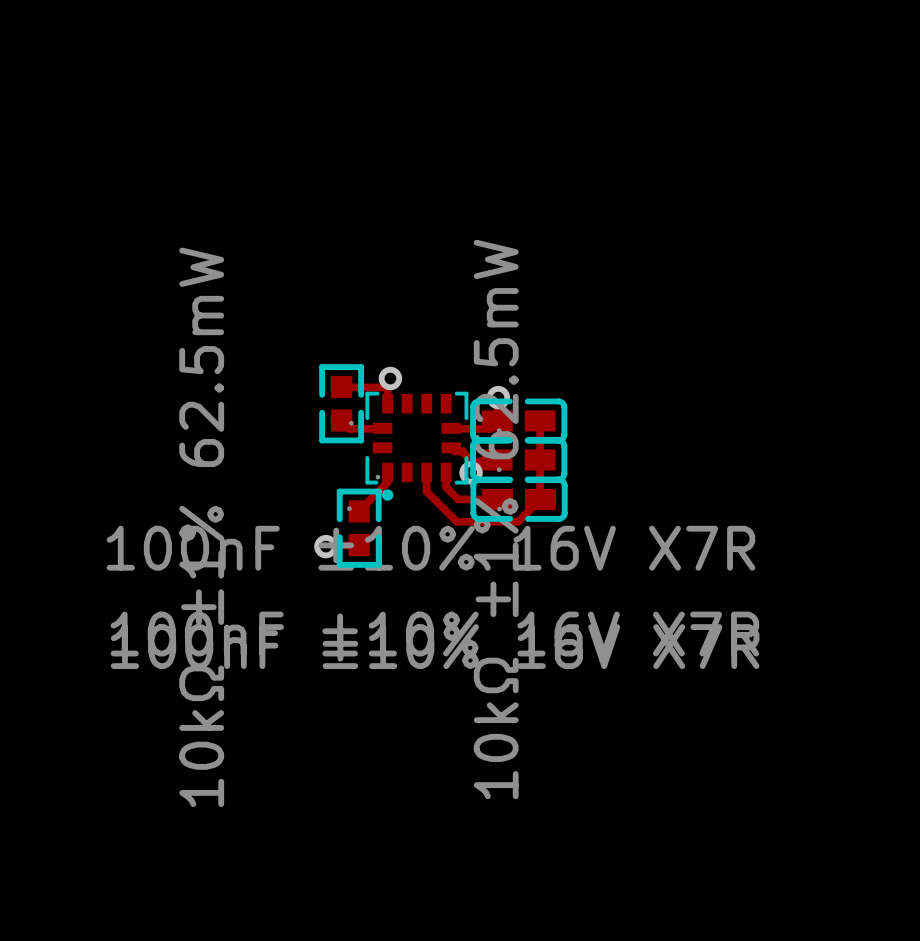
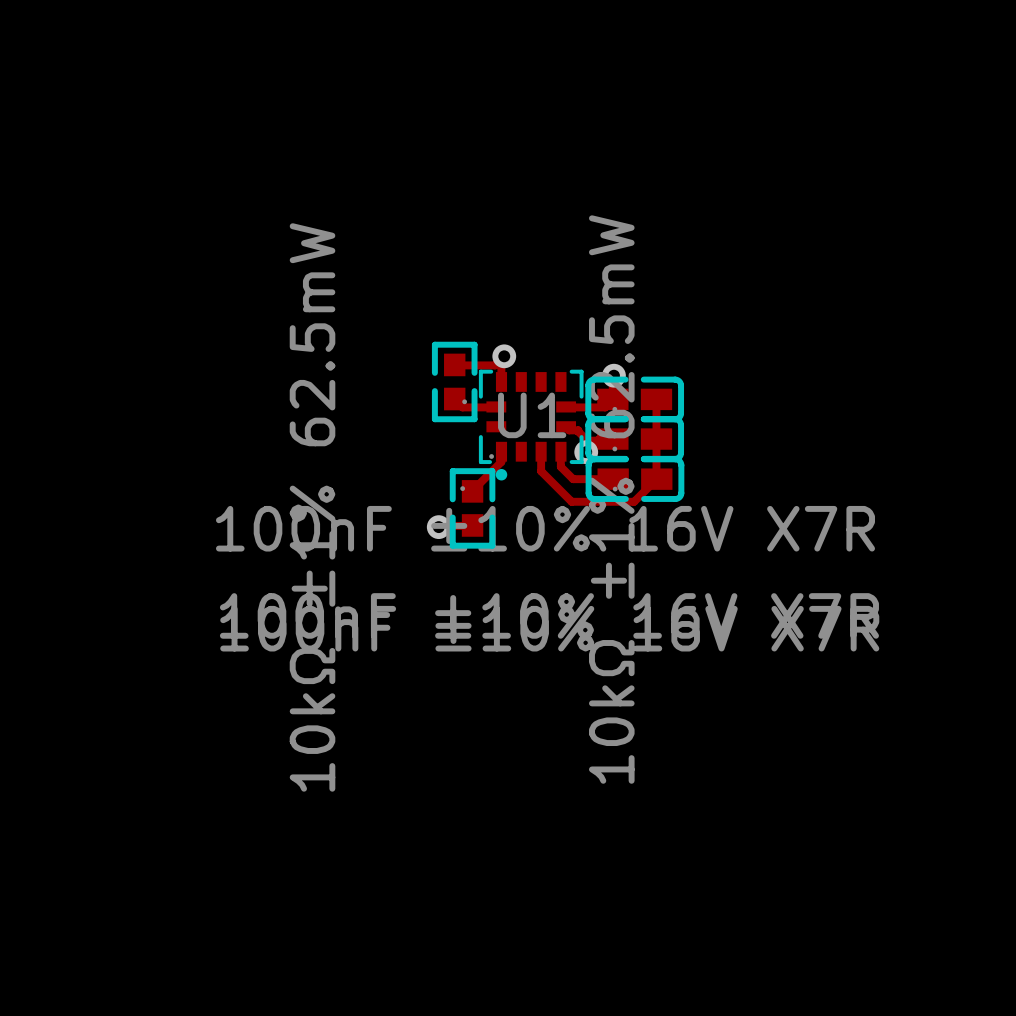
U1 name: none -> U1 (532, 415)

